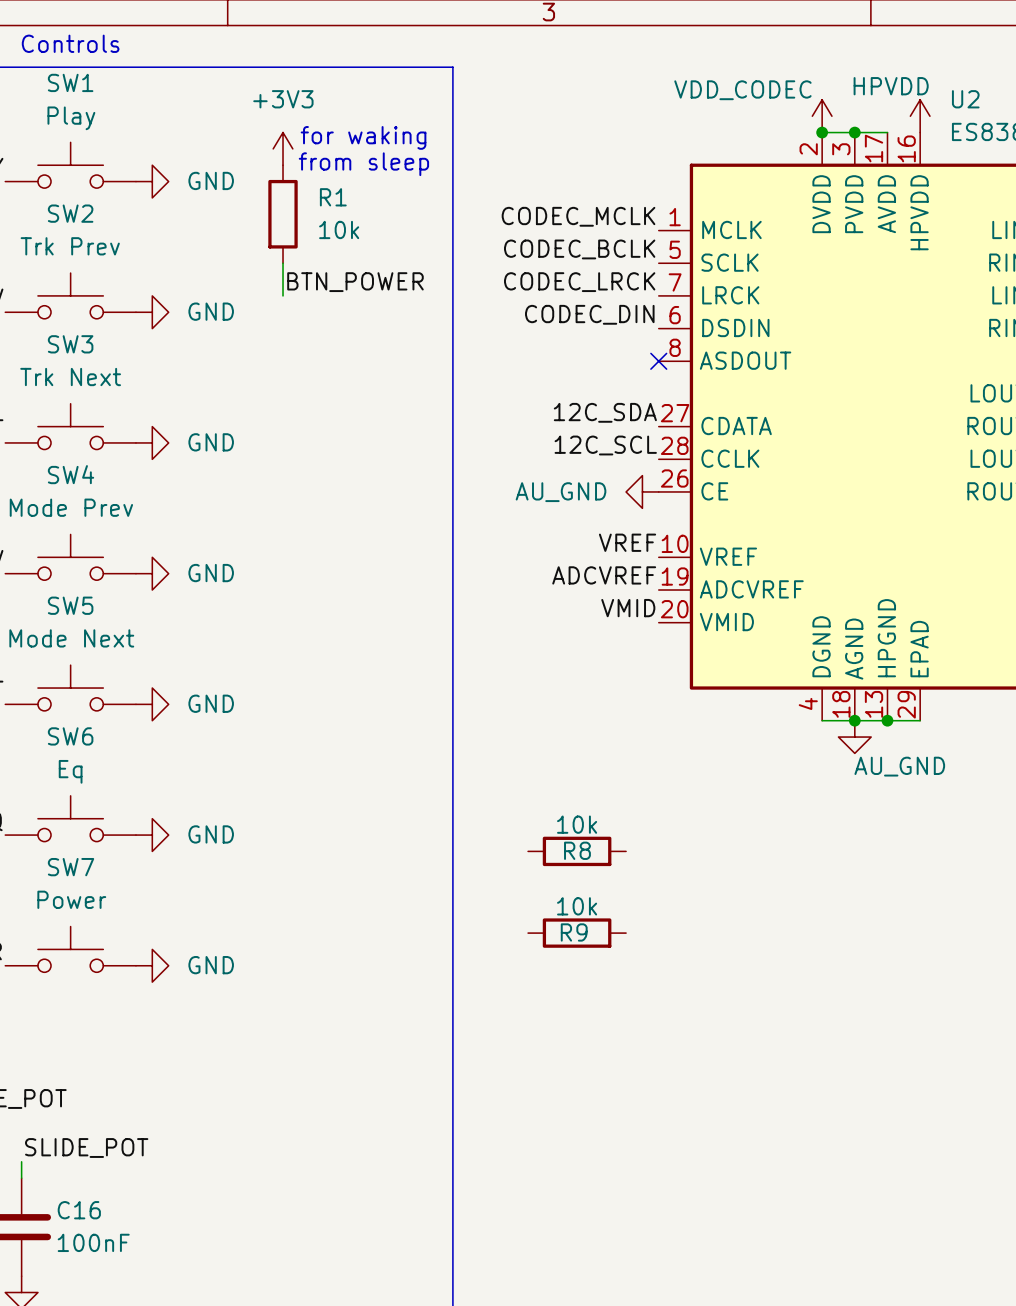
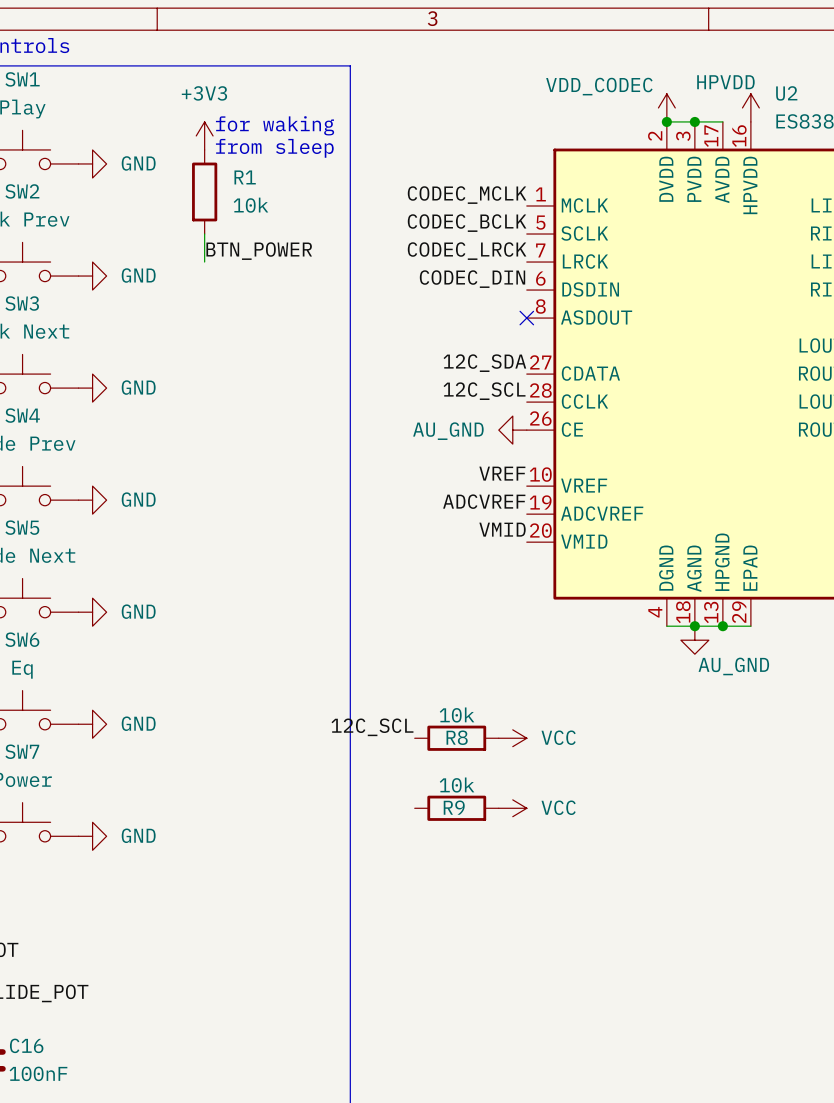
label: none -> 12C_SCL (372, 727)
power symbol: none -> VCC (512, 738)
power symbol: none -> VCC (512, 808)

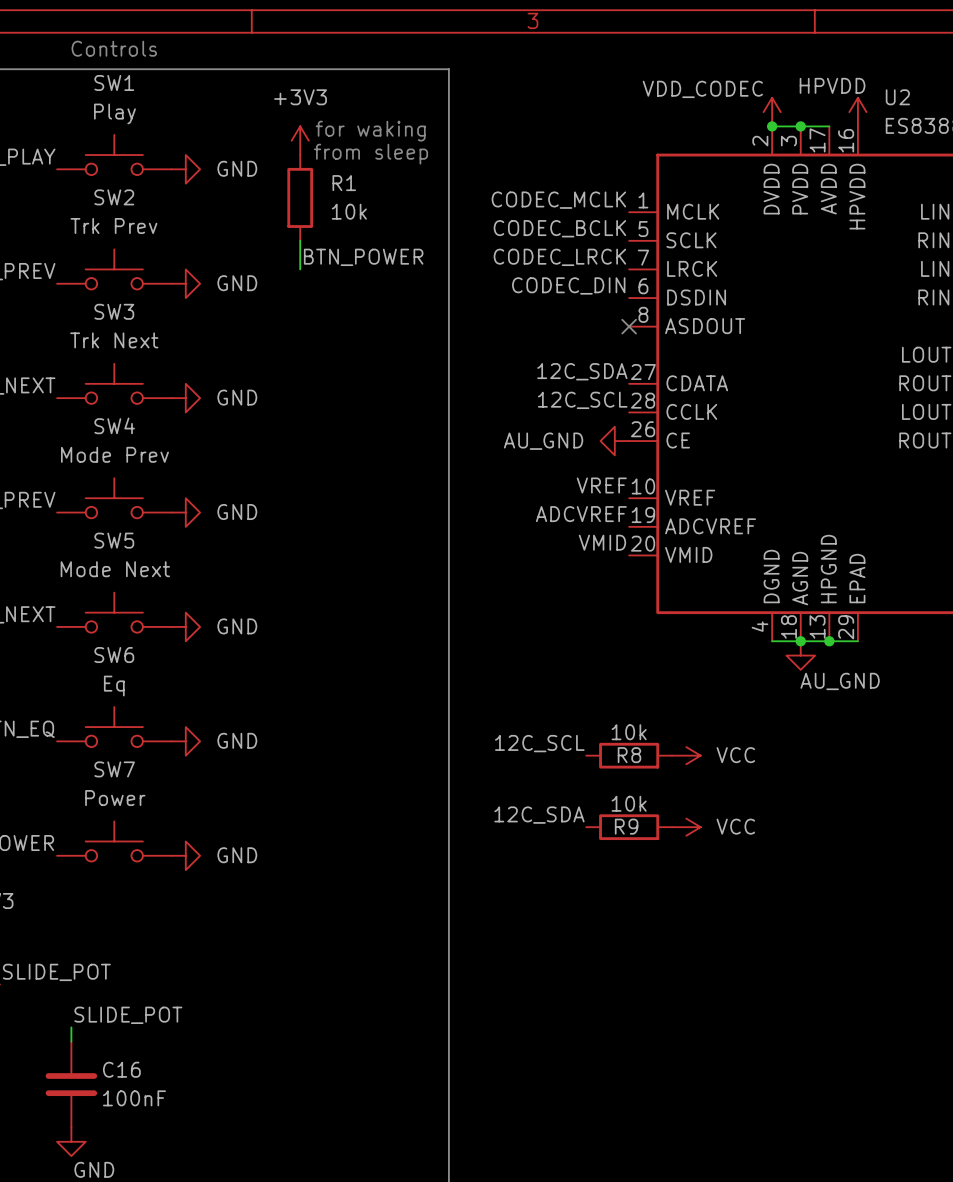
label position: 12C_SCL (372, 727) -> 12C_SCL (539, 743)
R8 position: (456, 738) -> (629, 755)
power symbol: VCC (512, 738) -> none
power symbol: none -> VCC (686, 755)
label: none -> 12C_SDA (539, 815)
R9 position: (456, 808) -> (629, 827)
power symbol: VCC (512, 808) -> none
power symbol: none -> VCC (686, 827)

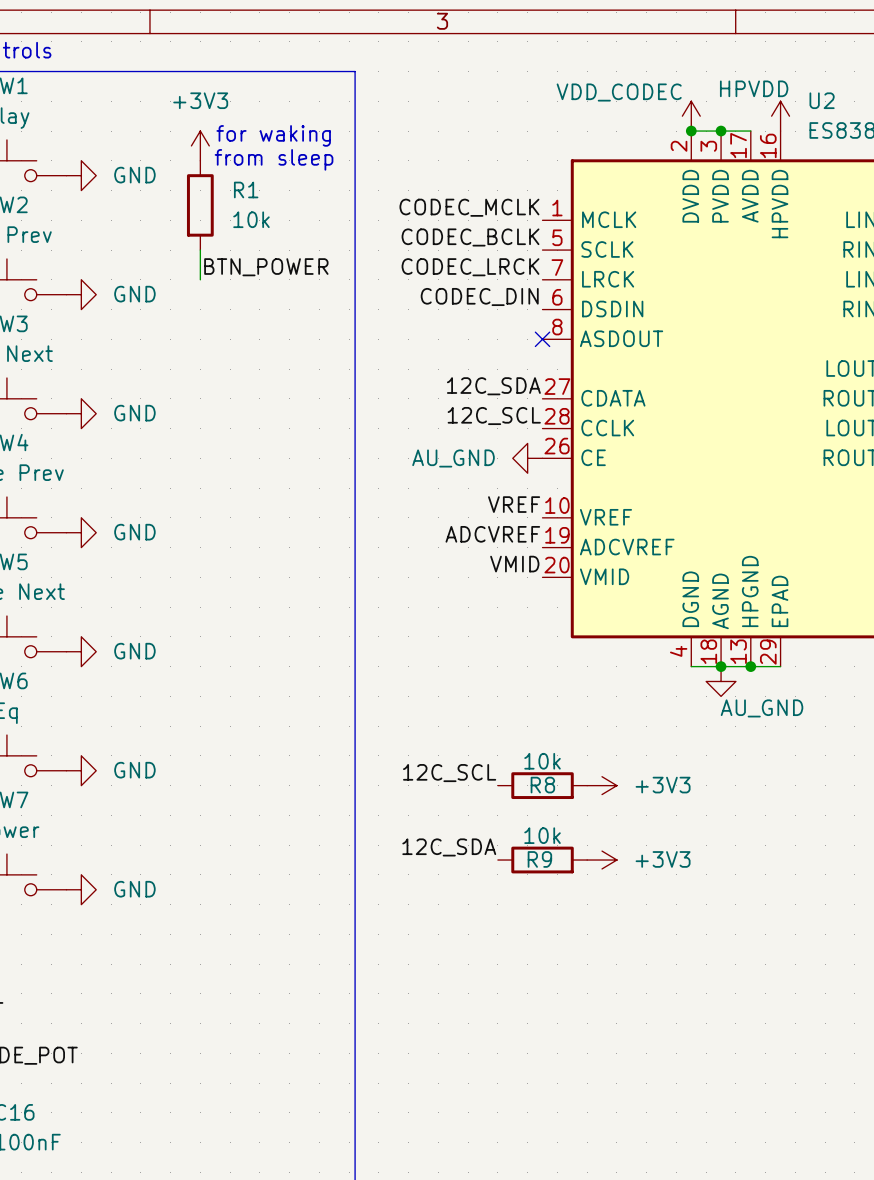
power symbol: VCC (686, 755) -> +3V3 (602, 785)
power symbol: VCC (686, 827) -> +3V3 (602, 860)

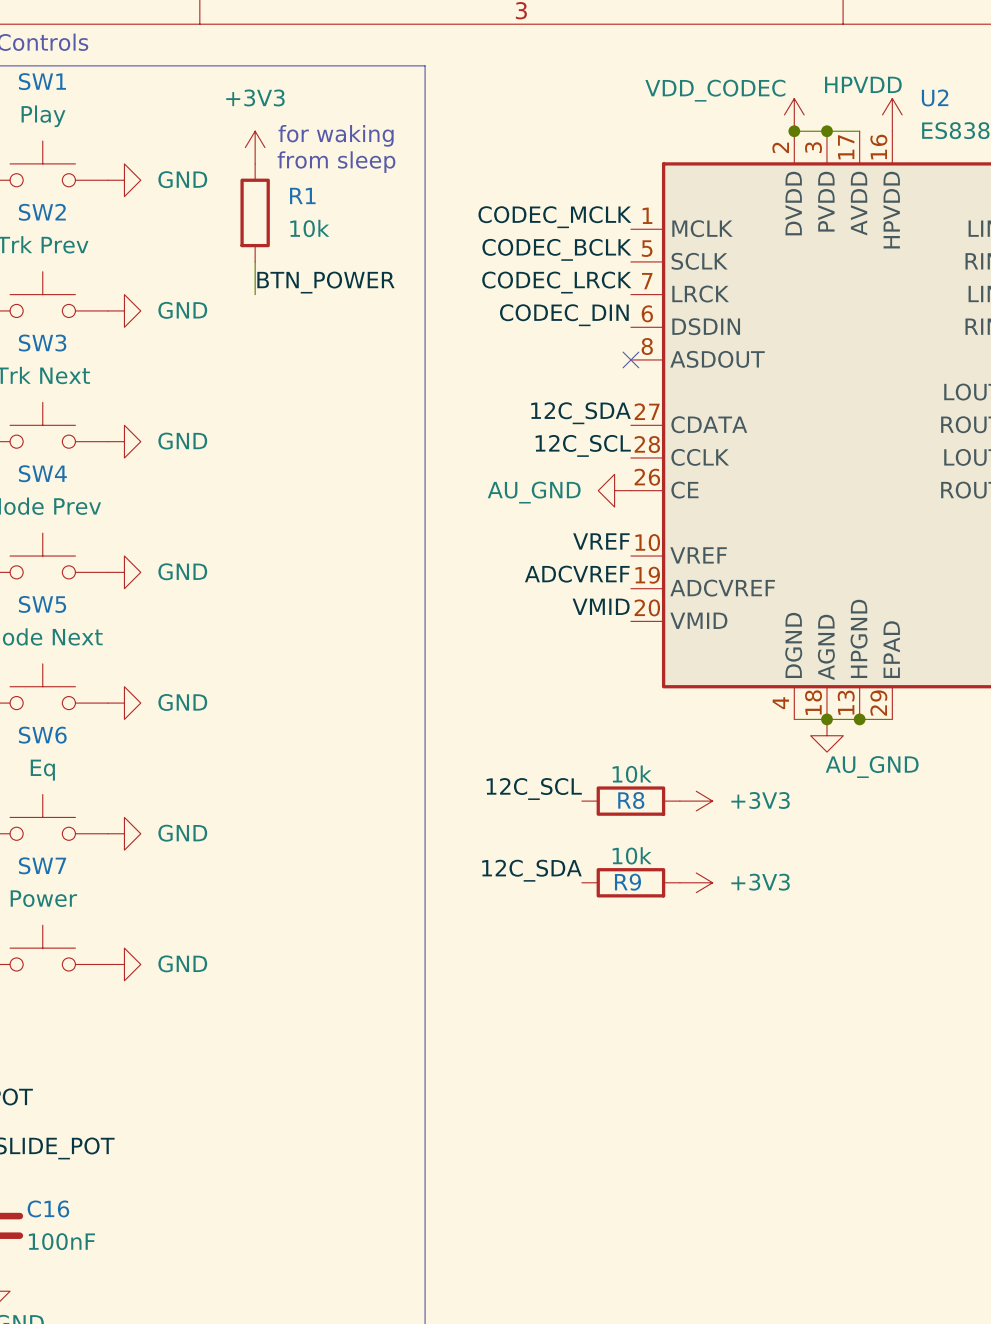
power symbol: none -> +3V3 (696, 801)
label position: 12C_SCL (449, 773) -> 12C_SCL (534, 789)
R8 position: (542, 785) -> (630, 801)
power symbol: +3V3 (602, 785) -> none
power symbol: none -> +3V3 (696, 882)
label position: 12C_SDA (449, 847) -> 12C_SDA (531, 870)
R9 position: (542, 860) -> (630, 882)
power symbol: +3V3 (602, 860) -> none

